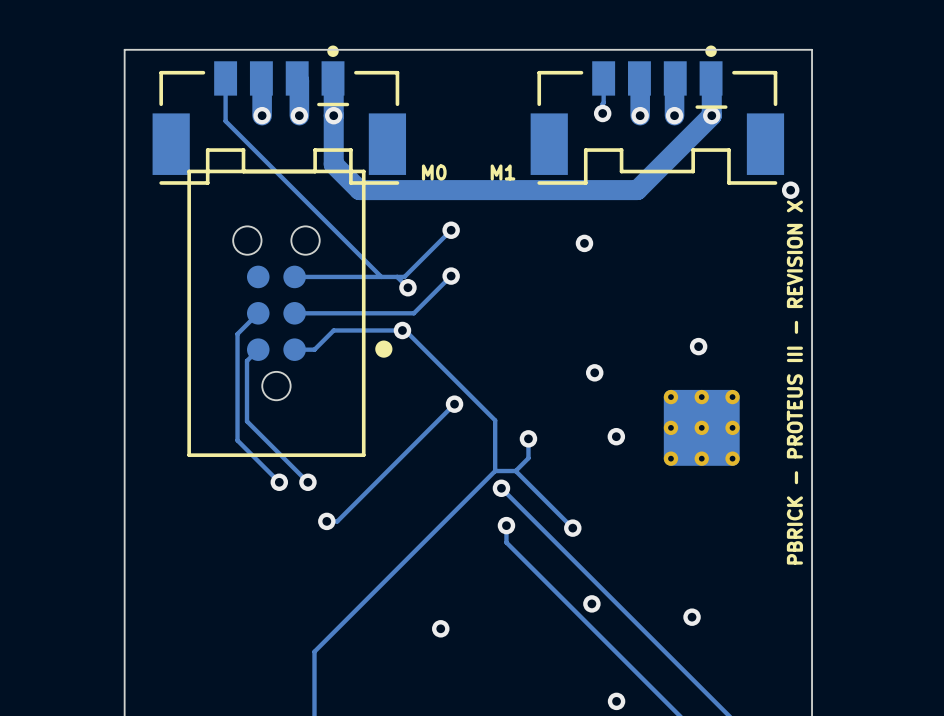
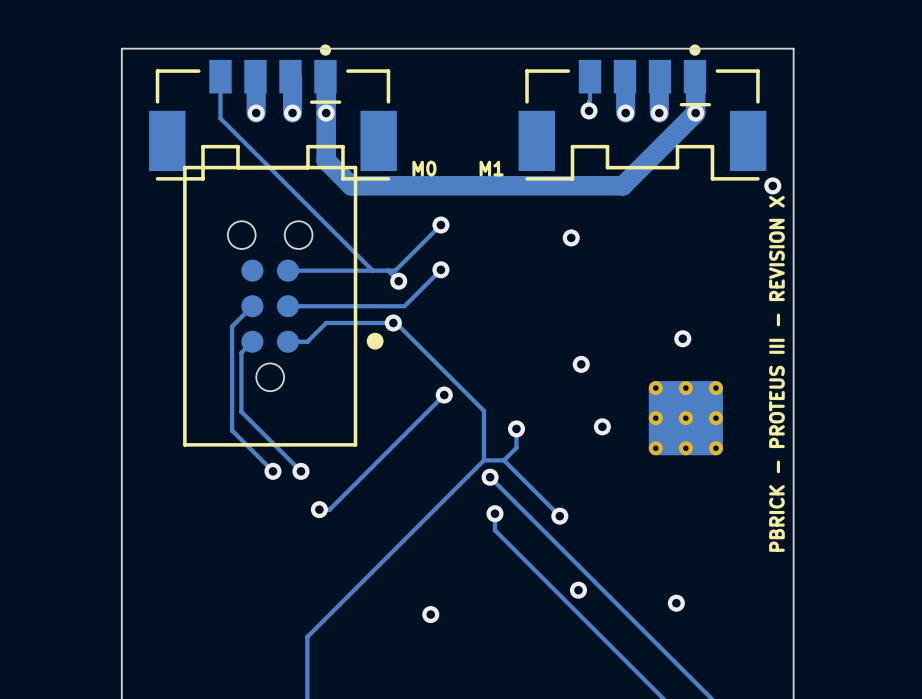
via: (616, 701) -> none

